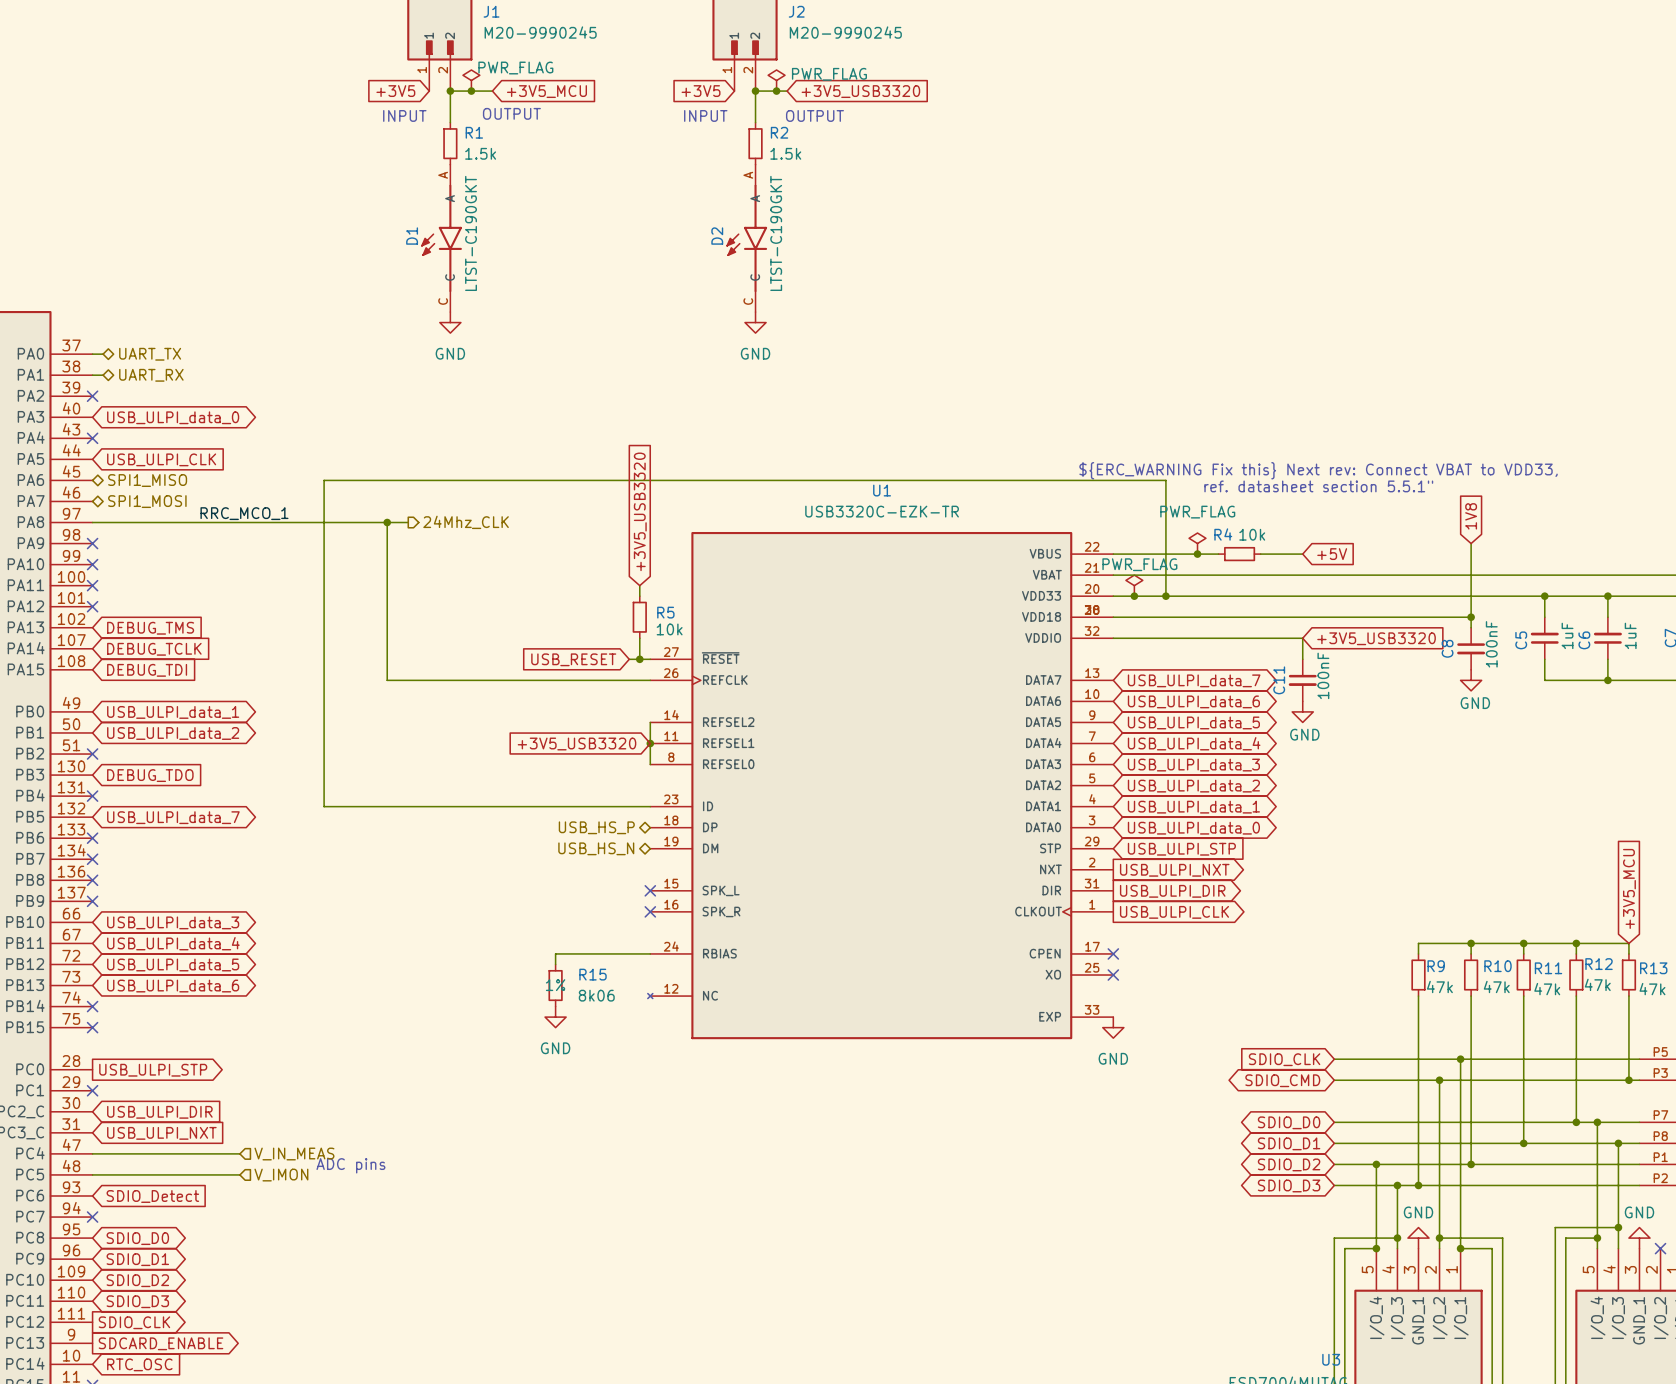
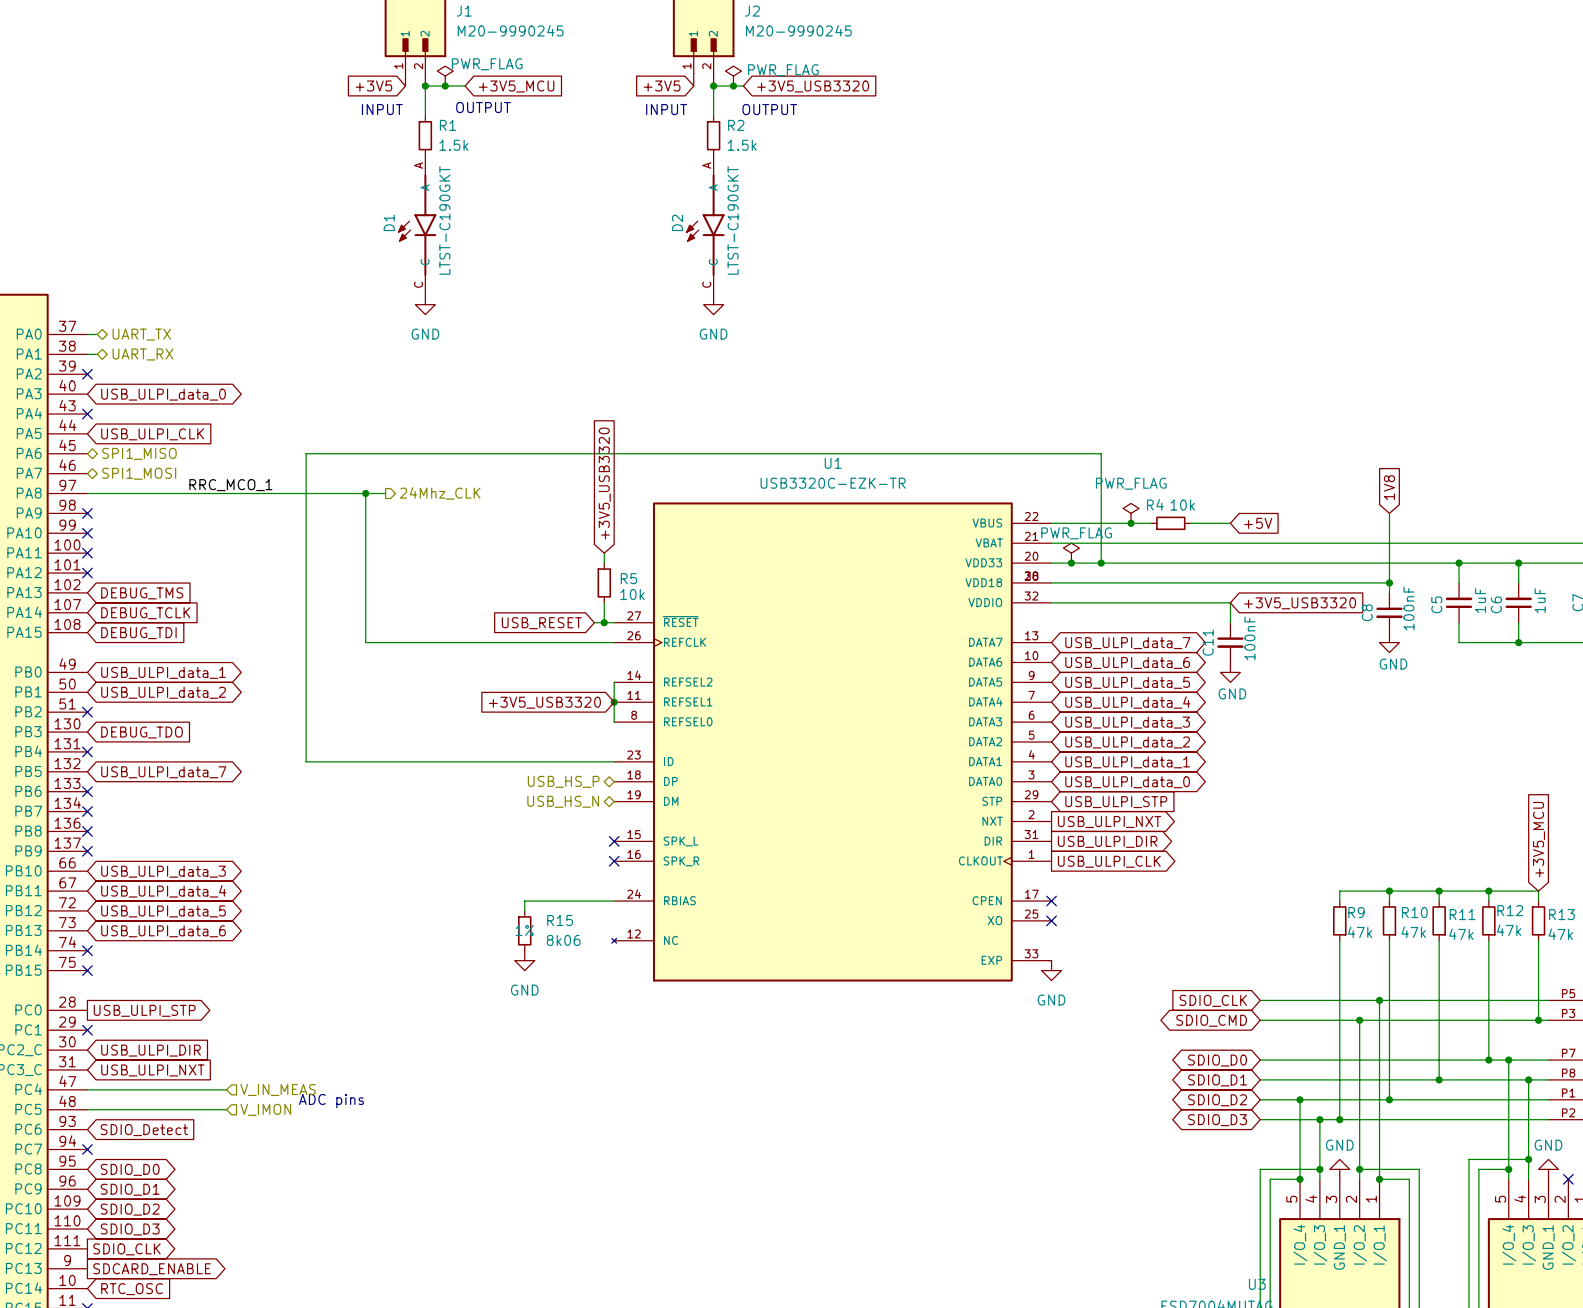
text: ${ERC_WARNING Fix this} Next rev: Connect VBAT to VDD33, (1318, 470) -> none
text: ref. datasheet section 5.5.1" (1318, 486) -> none

